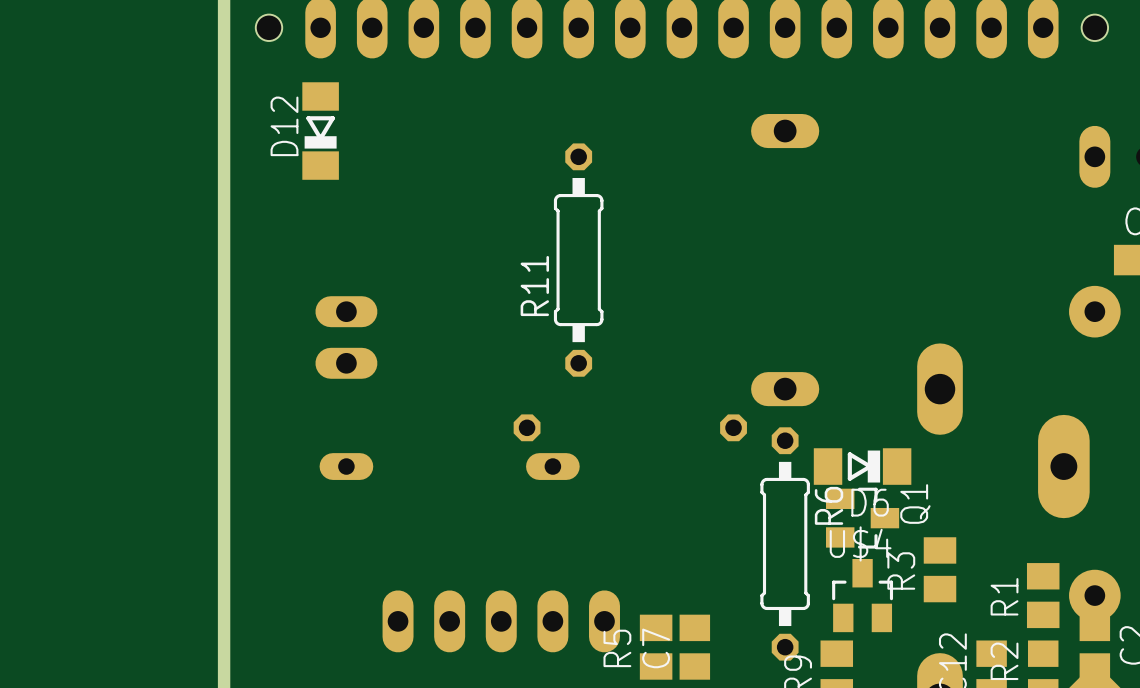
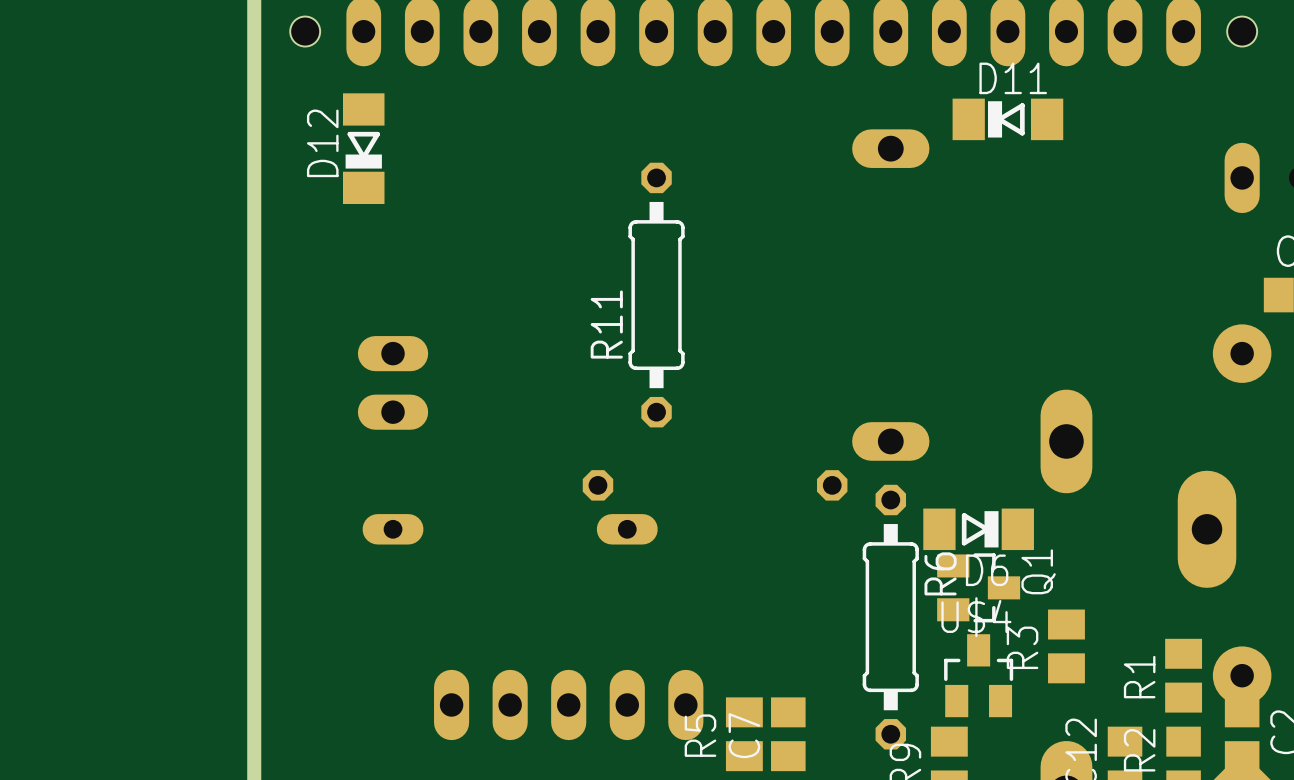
D11: none -> (1007, 119)

